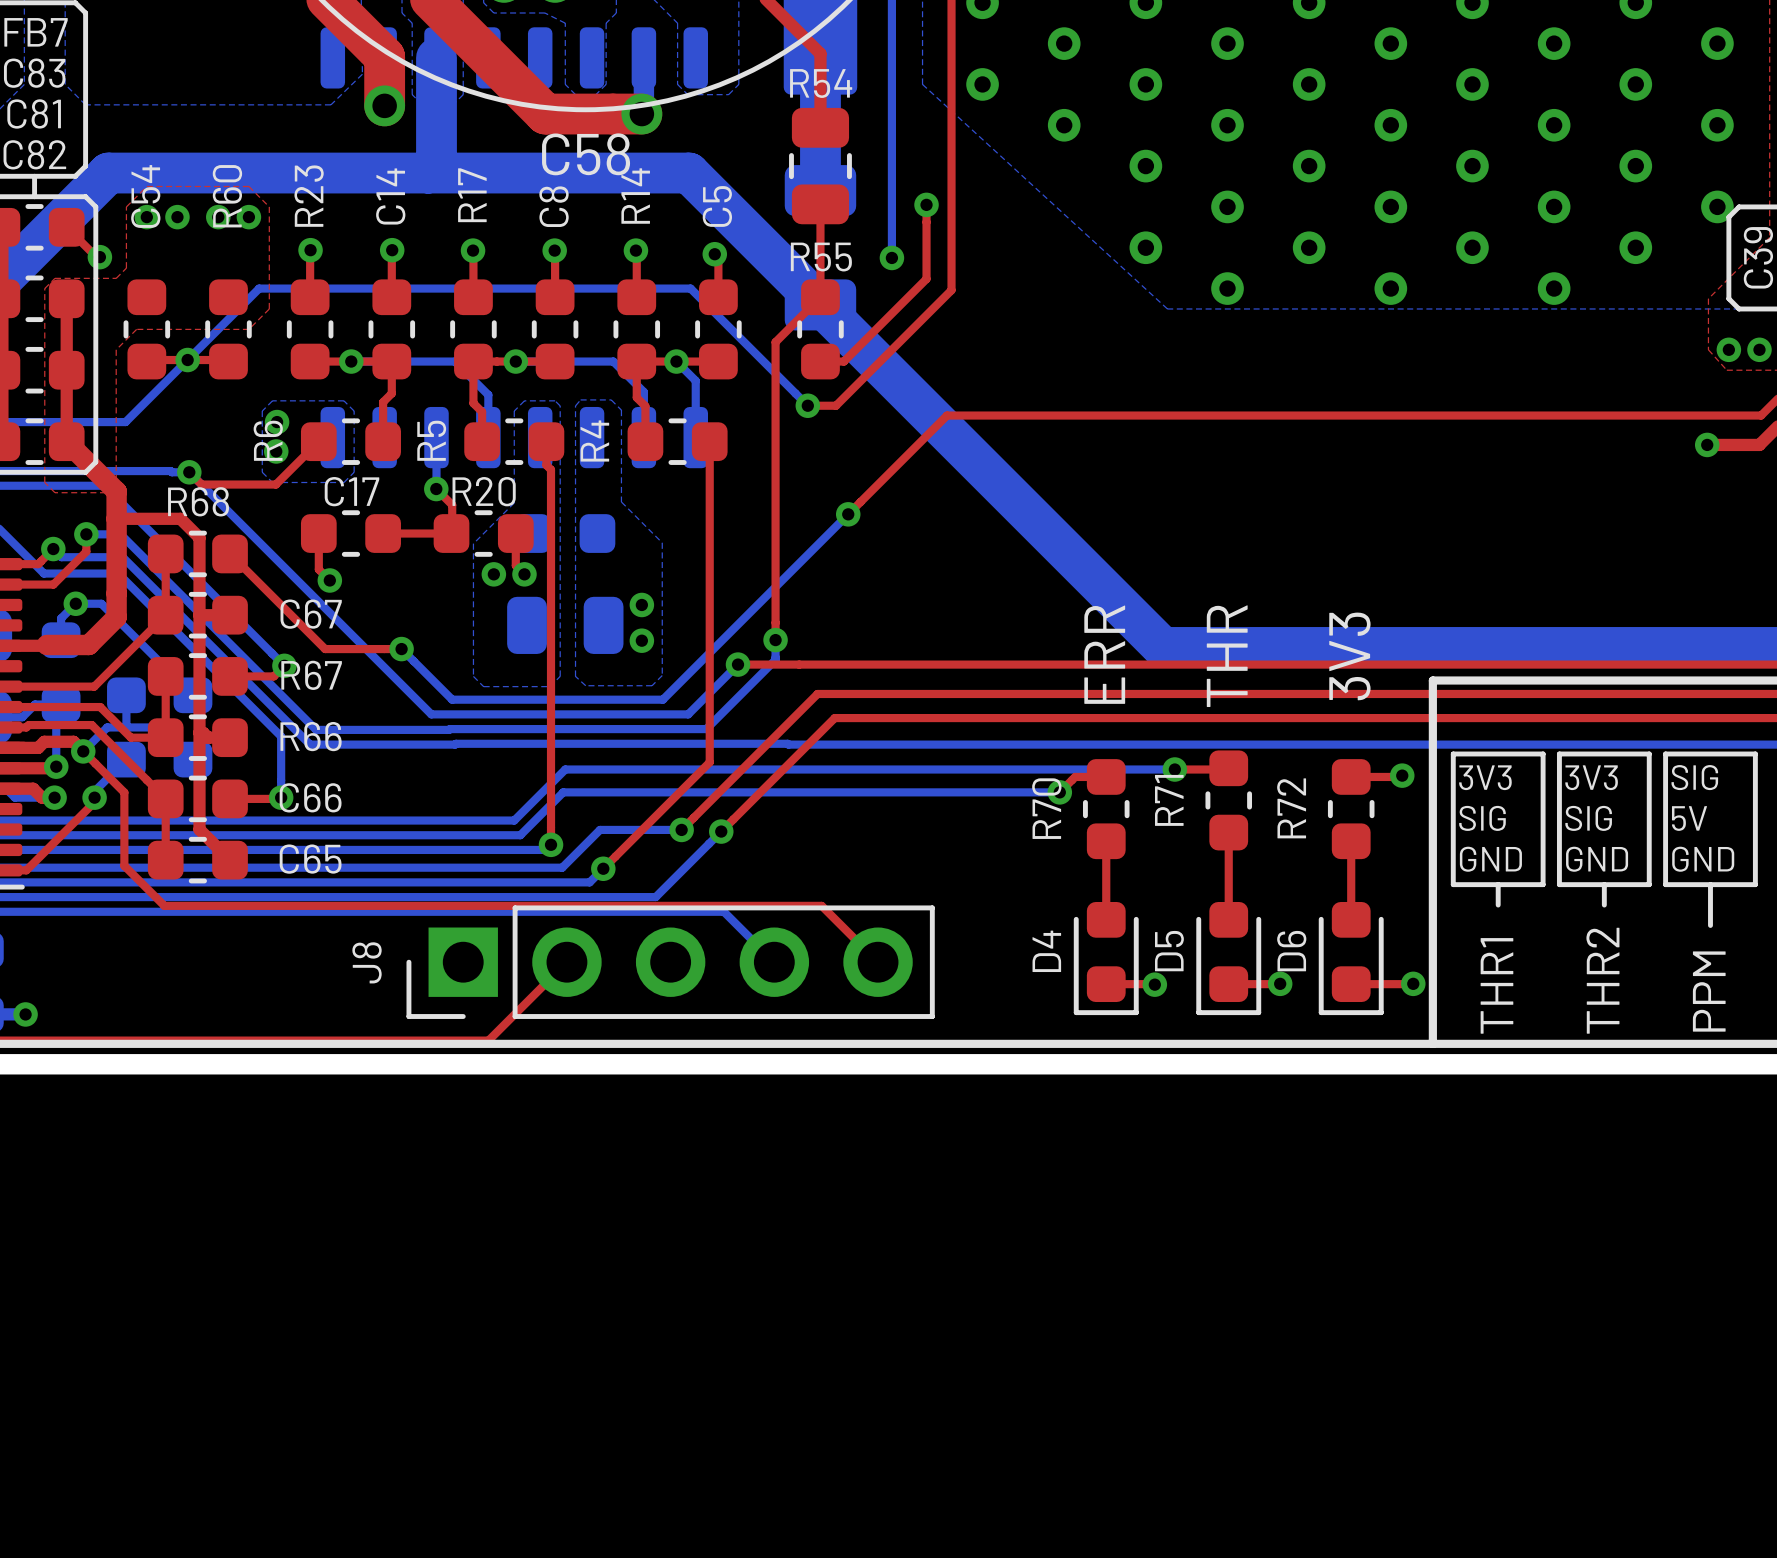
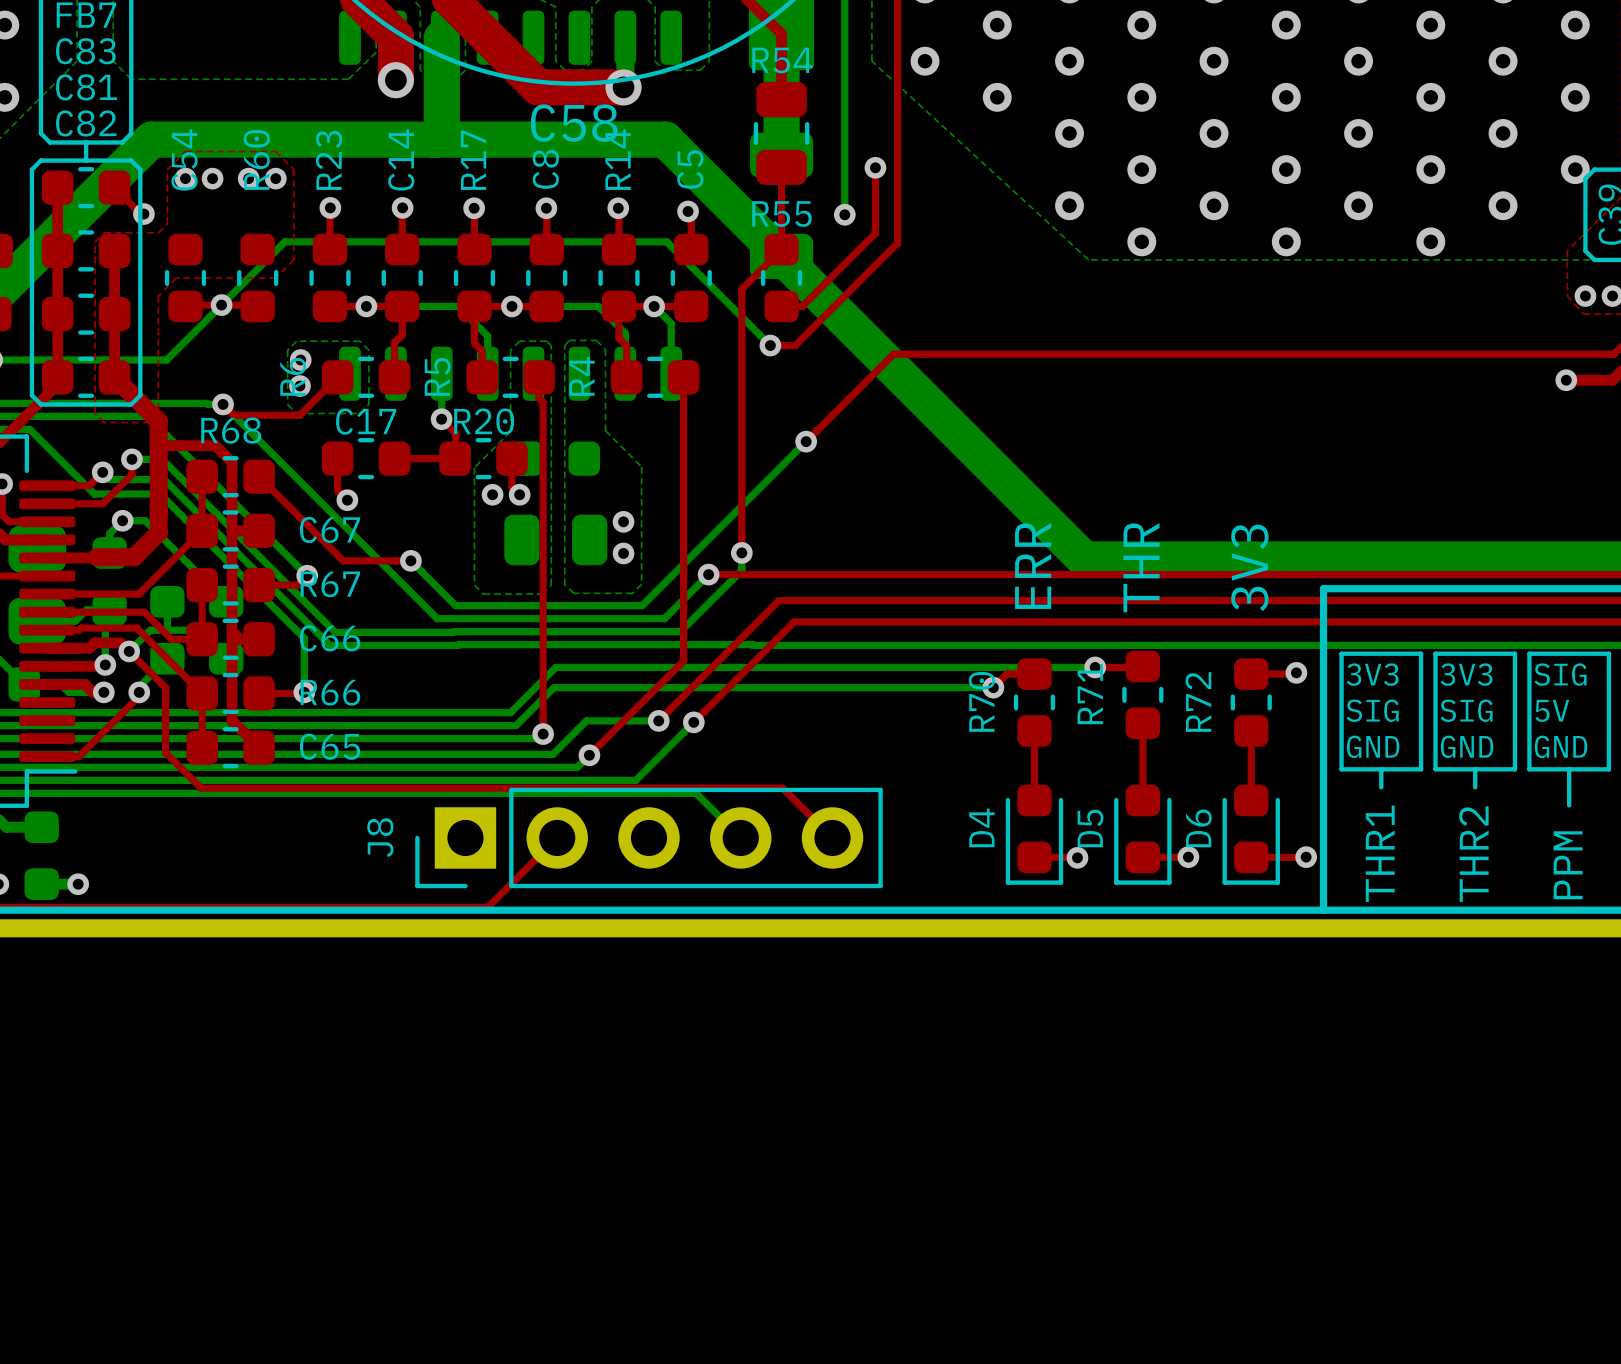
R66 name position: R66 (311, 736) -> R66 (330, 692)
C66 name position: C66 (310, 797) -> C66 (330, 638)

